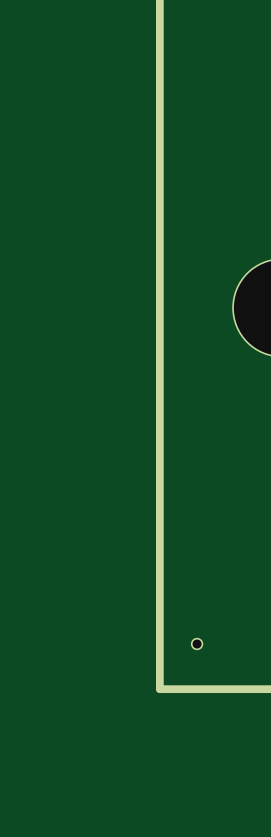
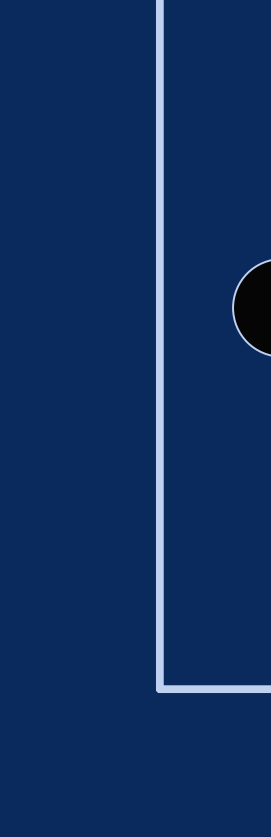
hole: (197, 644) -> none

